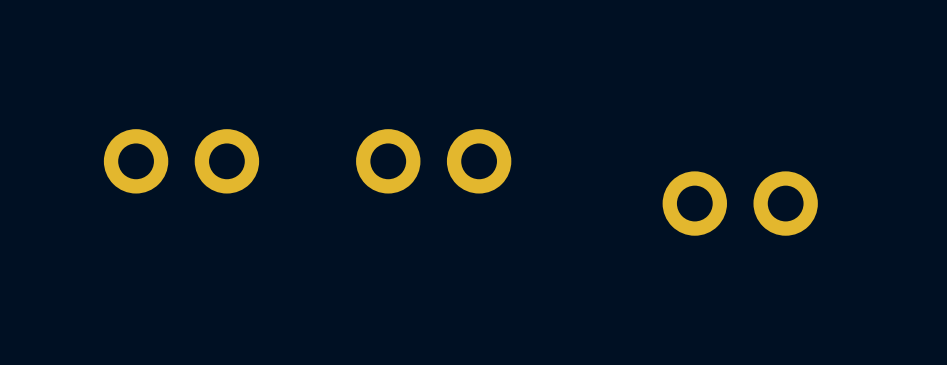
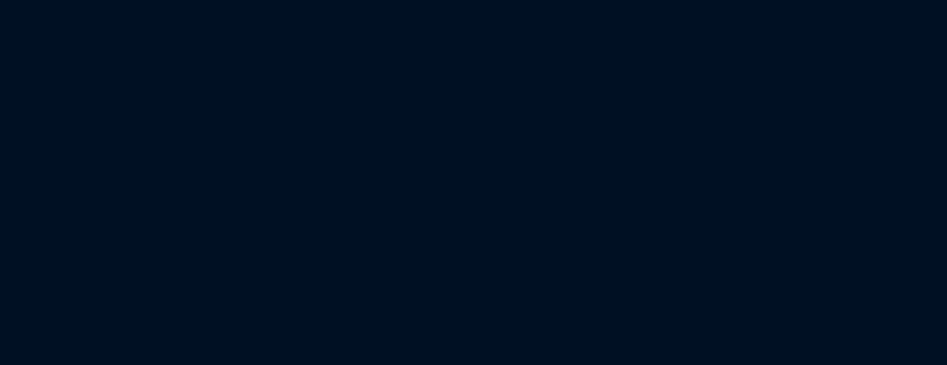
part: (181, 161) -> none
part: (433, 161) -> none
part: (740, 203) -> none

